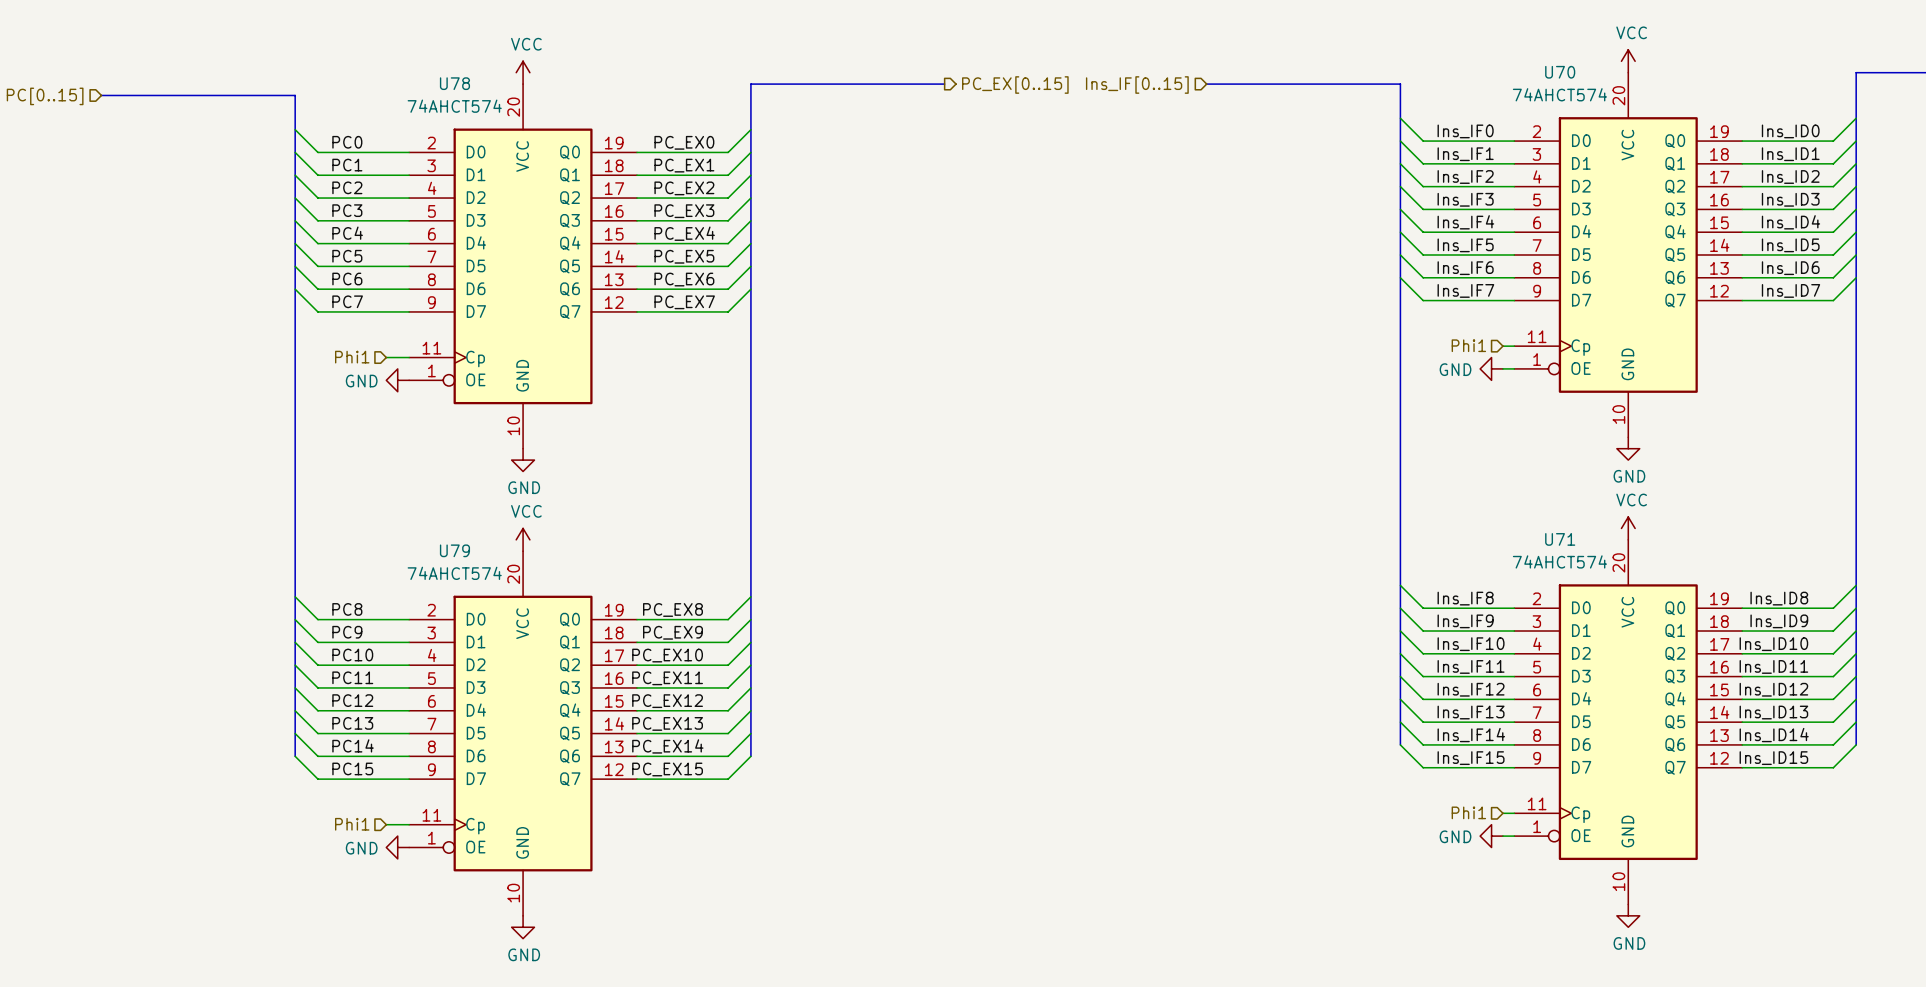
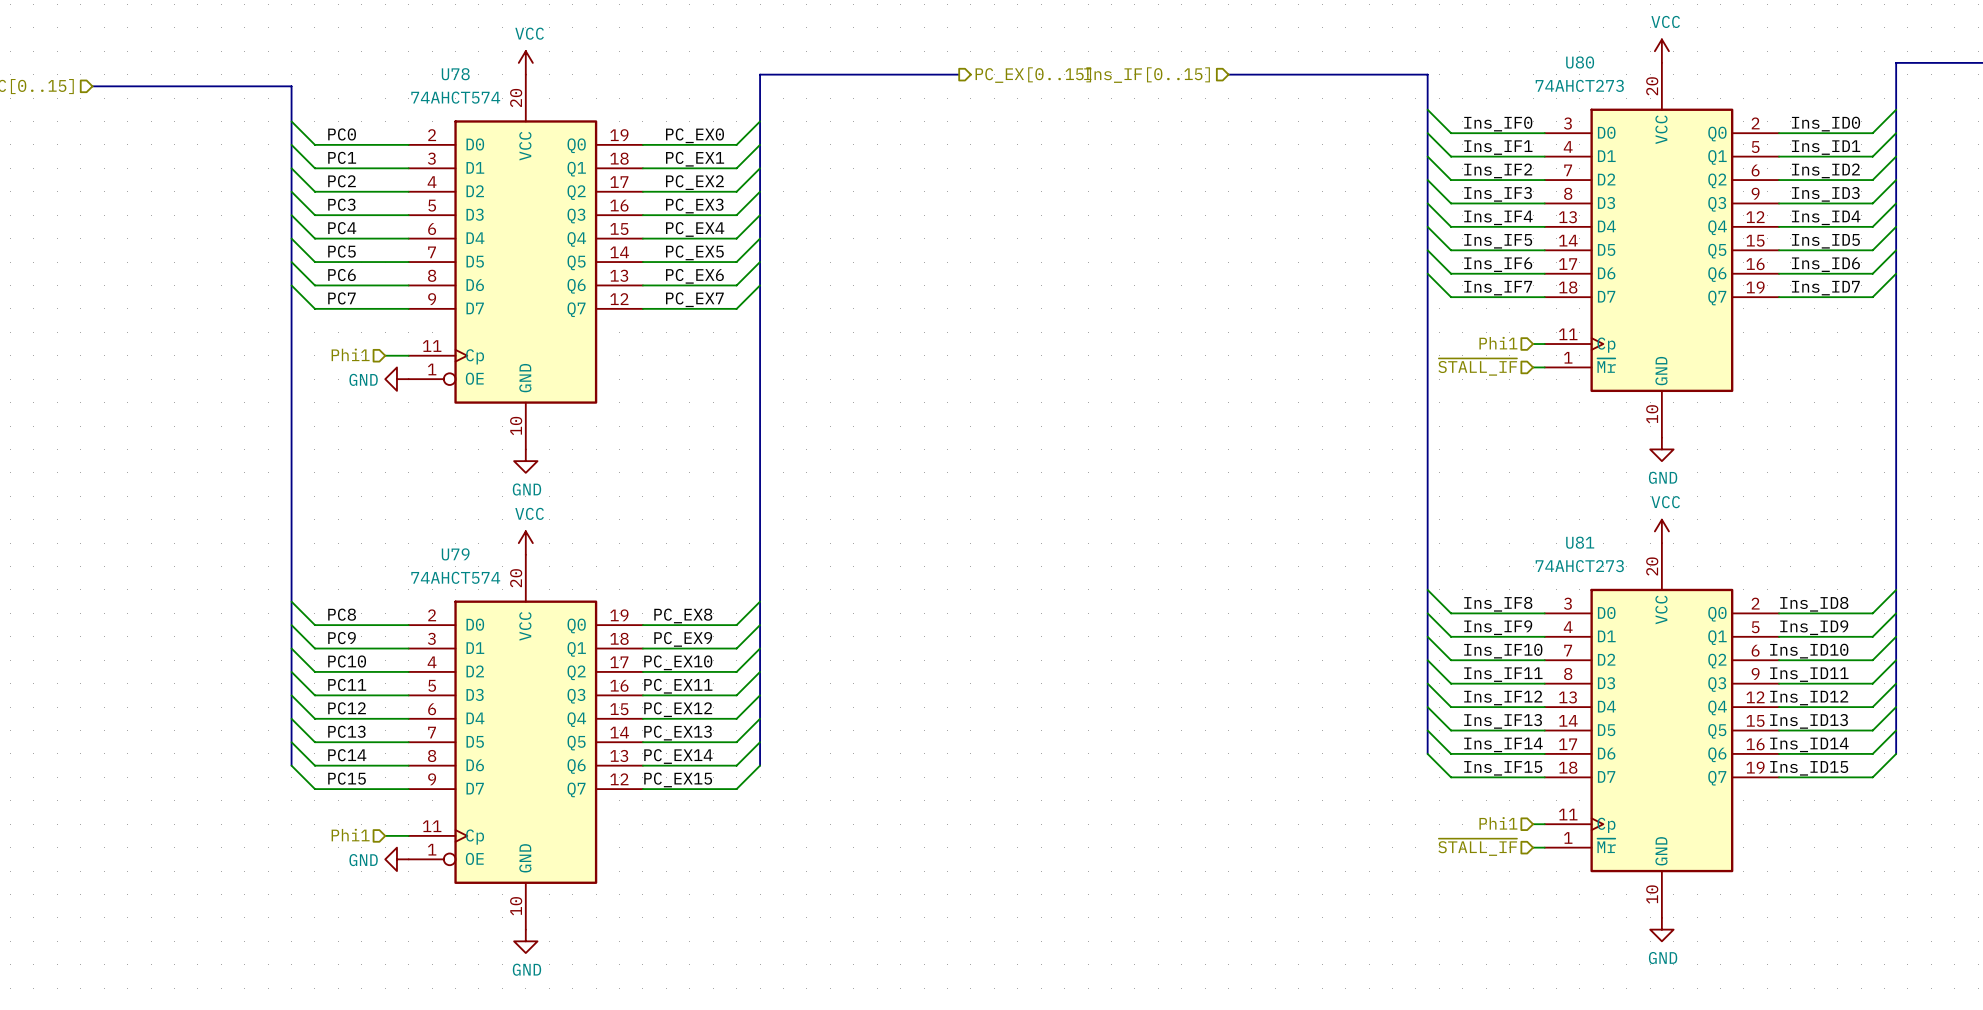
U70: 74AHCT574 (1628, 254) -> none
U80: none -> 74AHCT273 (1661, 250)
hierarchical label: none -> ~{STALL_IF} (1477, 367)
power symbol: GND (1491, 368) -> none
U71: 74AHCT574 (1628, 722) -> none
U81: none -> 74AHCT273 (1661, 730)
hierarchical label: none -> ~{STALL_IF} (1477, 847)
power symbol: GND (1491, 836) -> none

